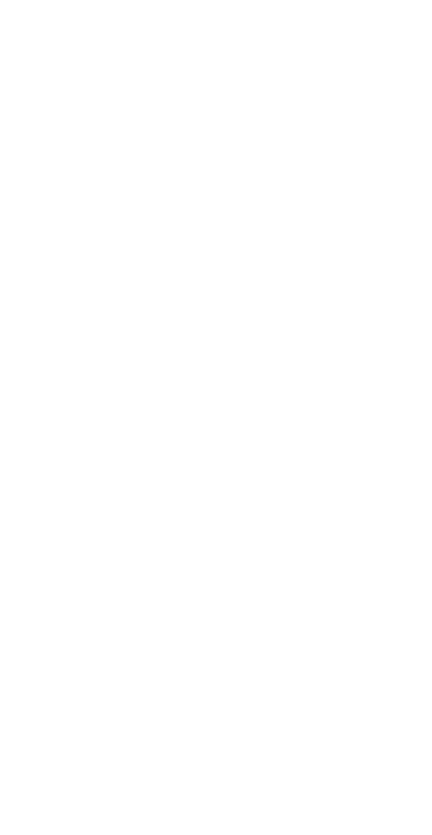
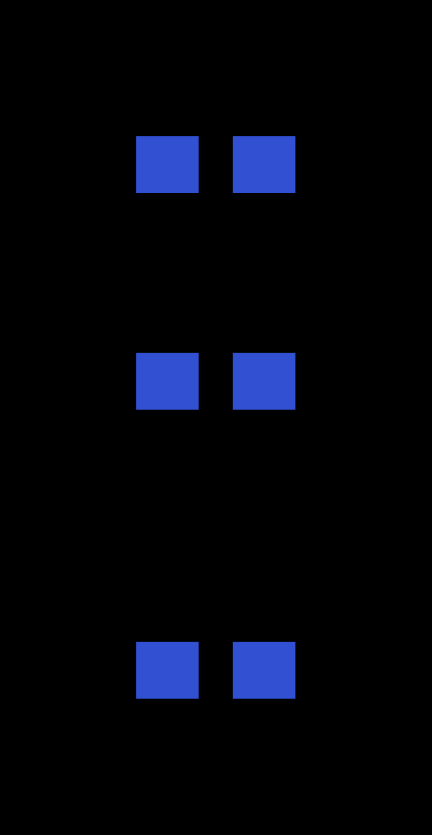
part: none -> (215, 164)
part: none -> (215, 381)
part: none -> (215, 670)

